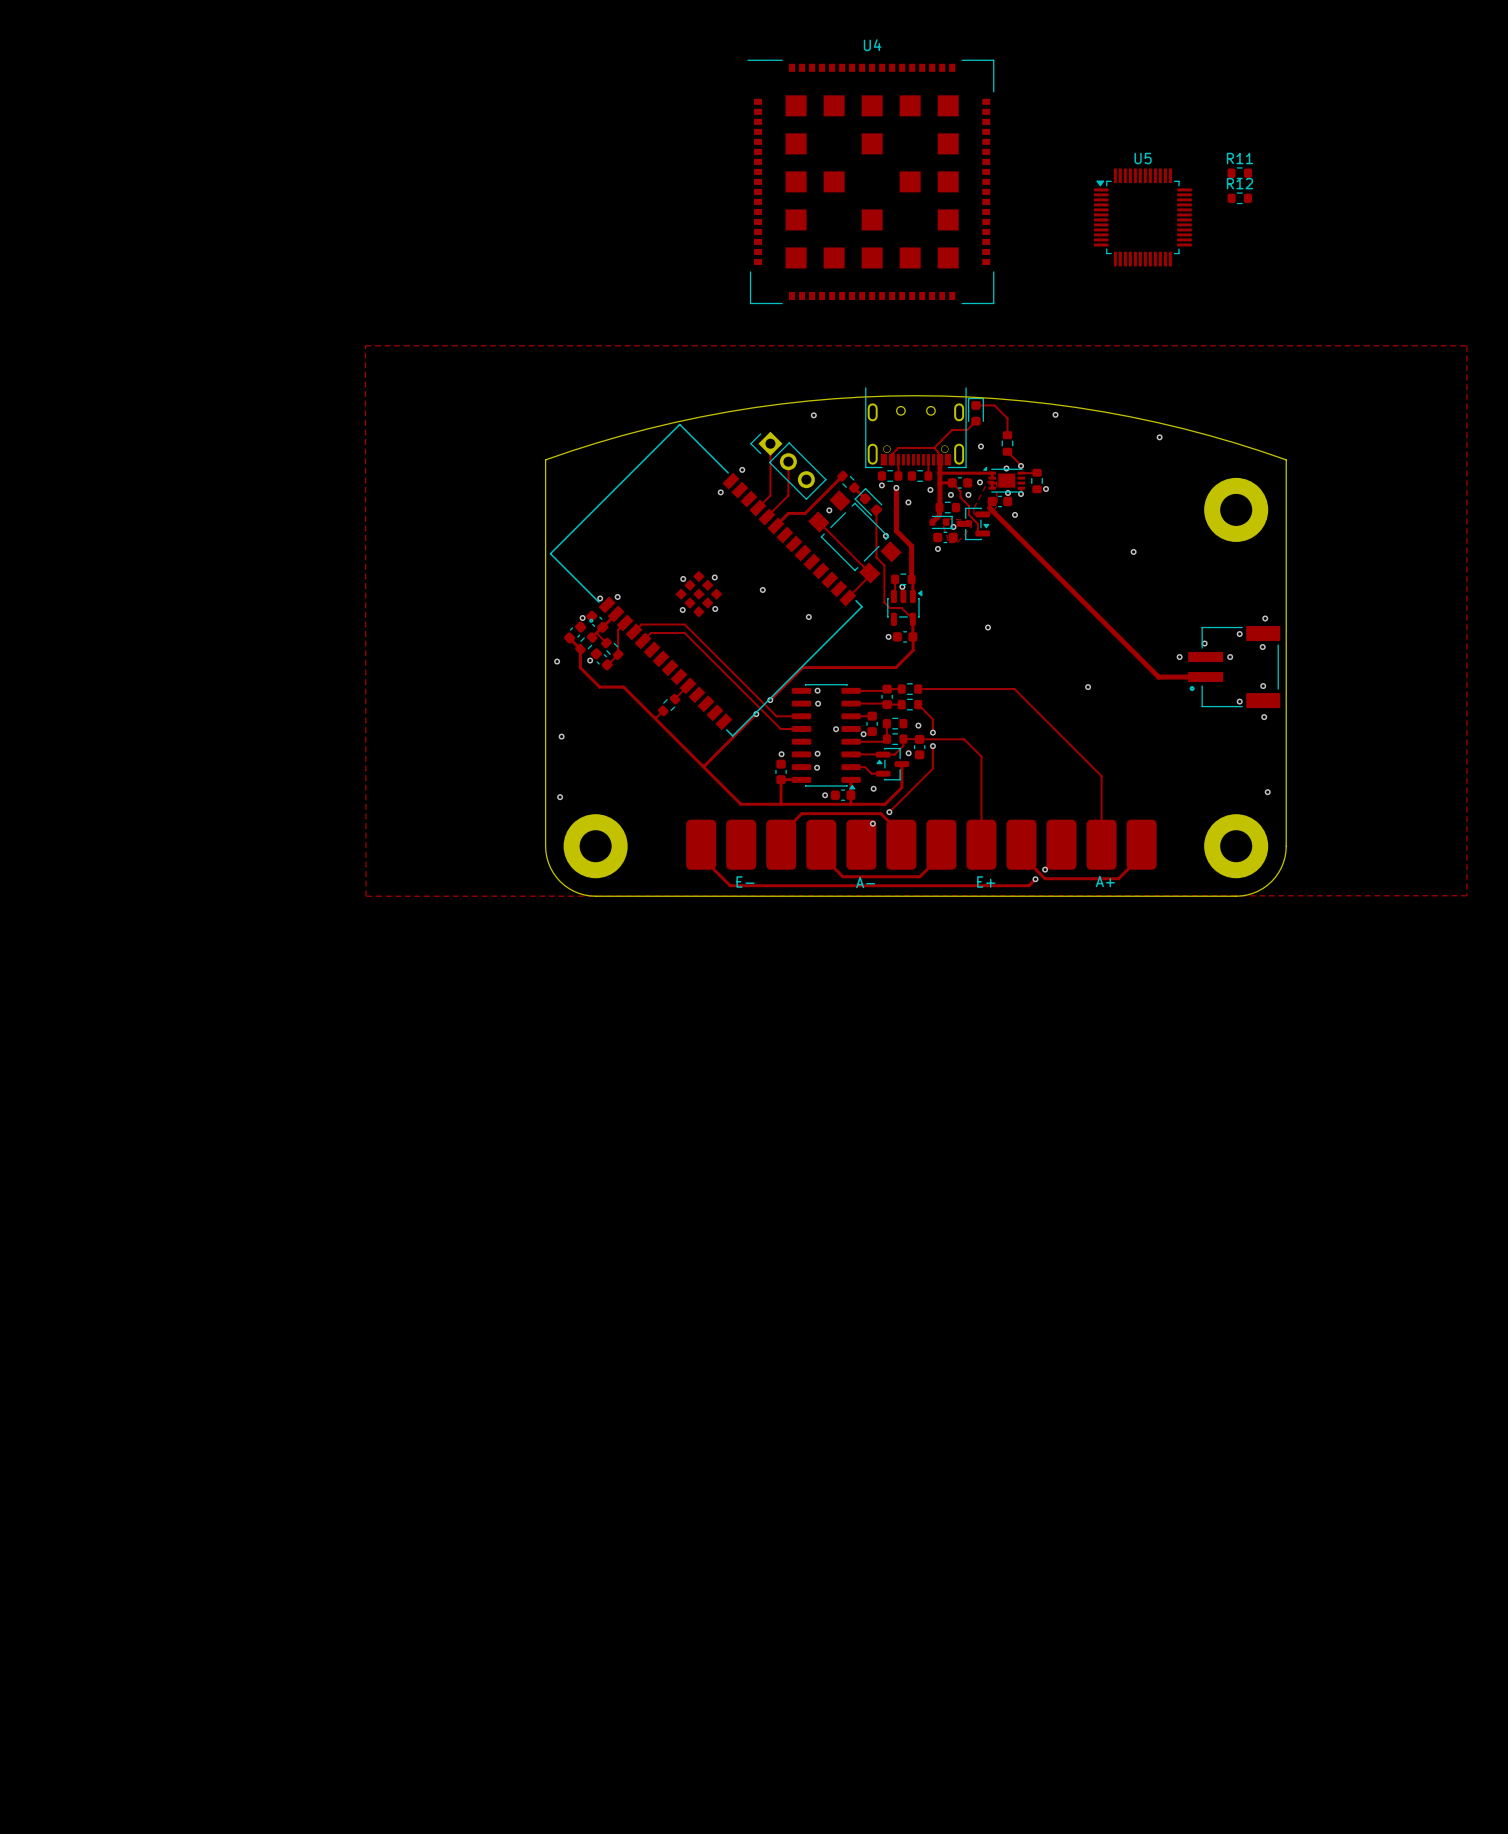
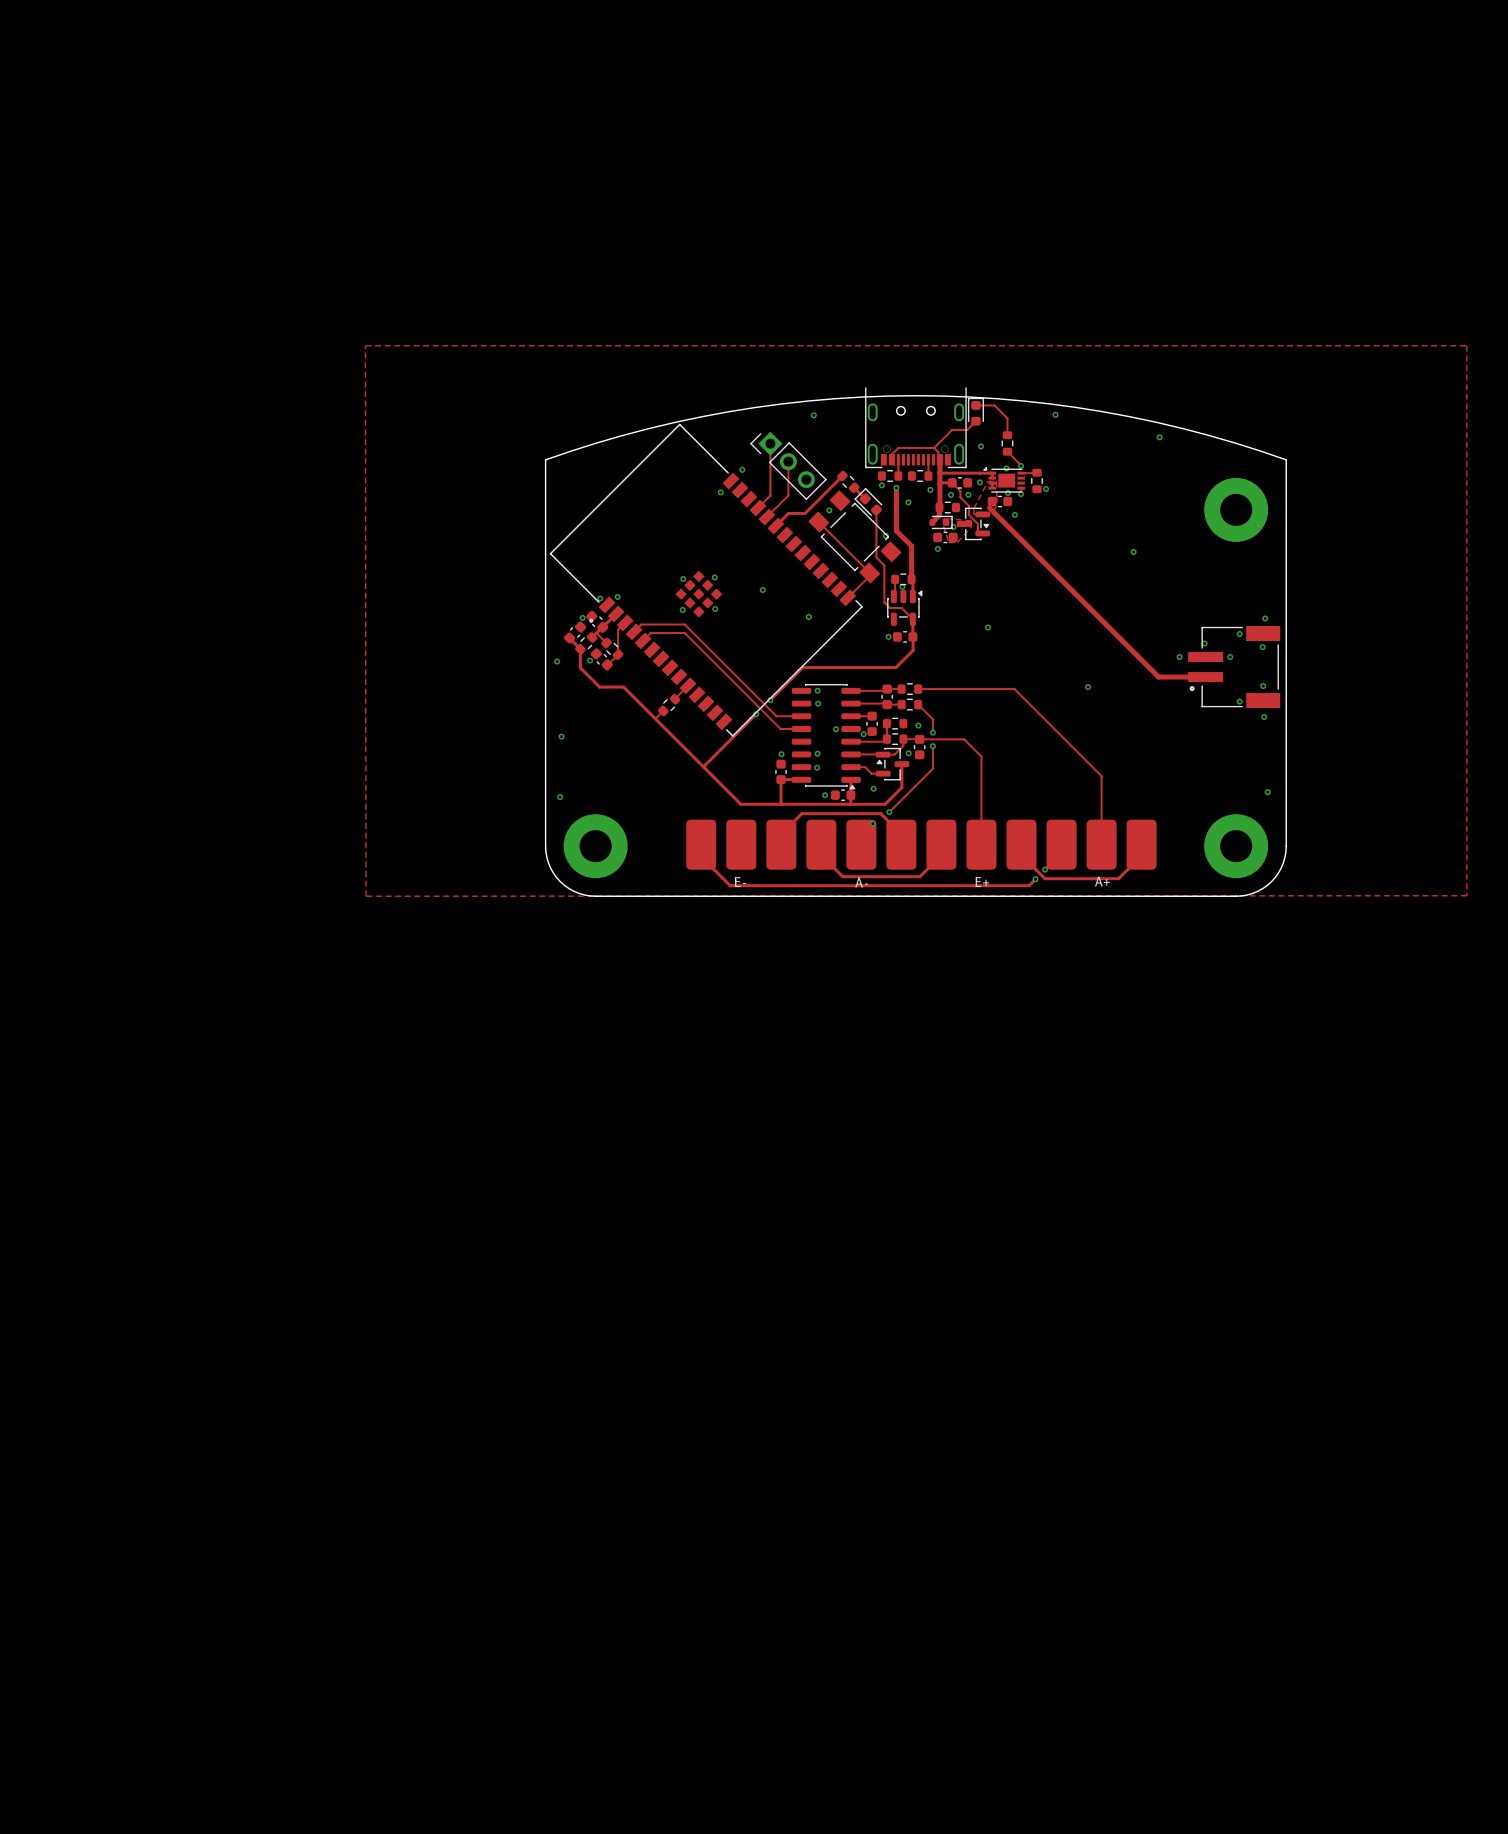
R11: (1239, 173) -> none
U4: (870, 181) -> none
R12: (1239, 198) -> none
U5: (1142, 217) -> none

